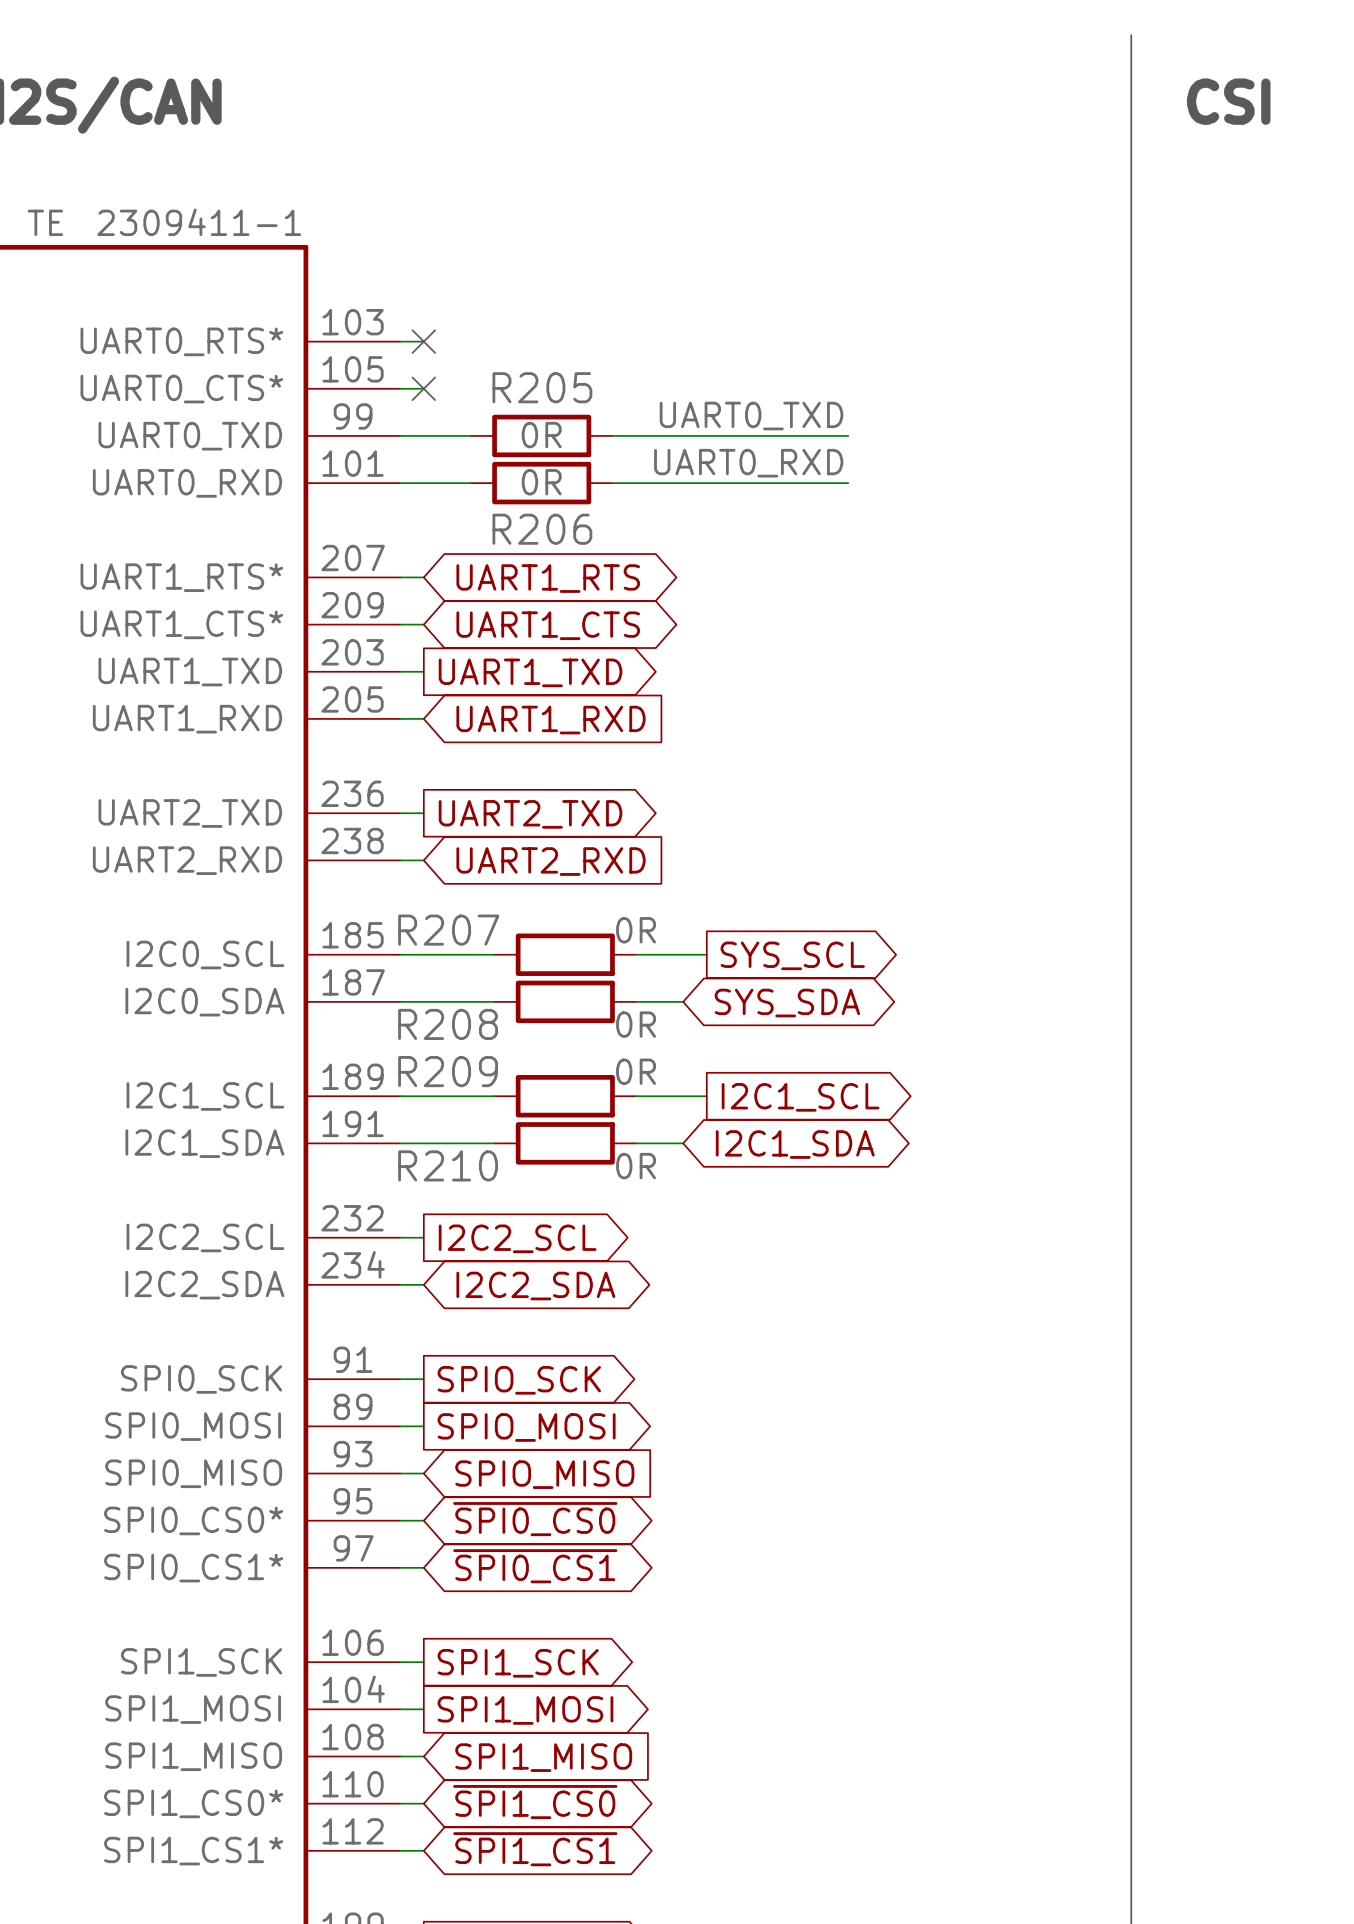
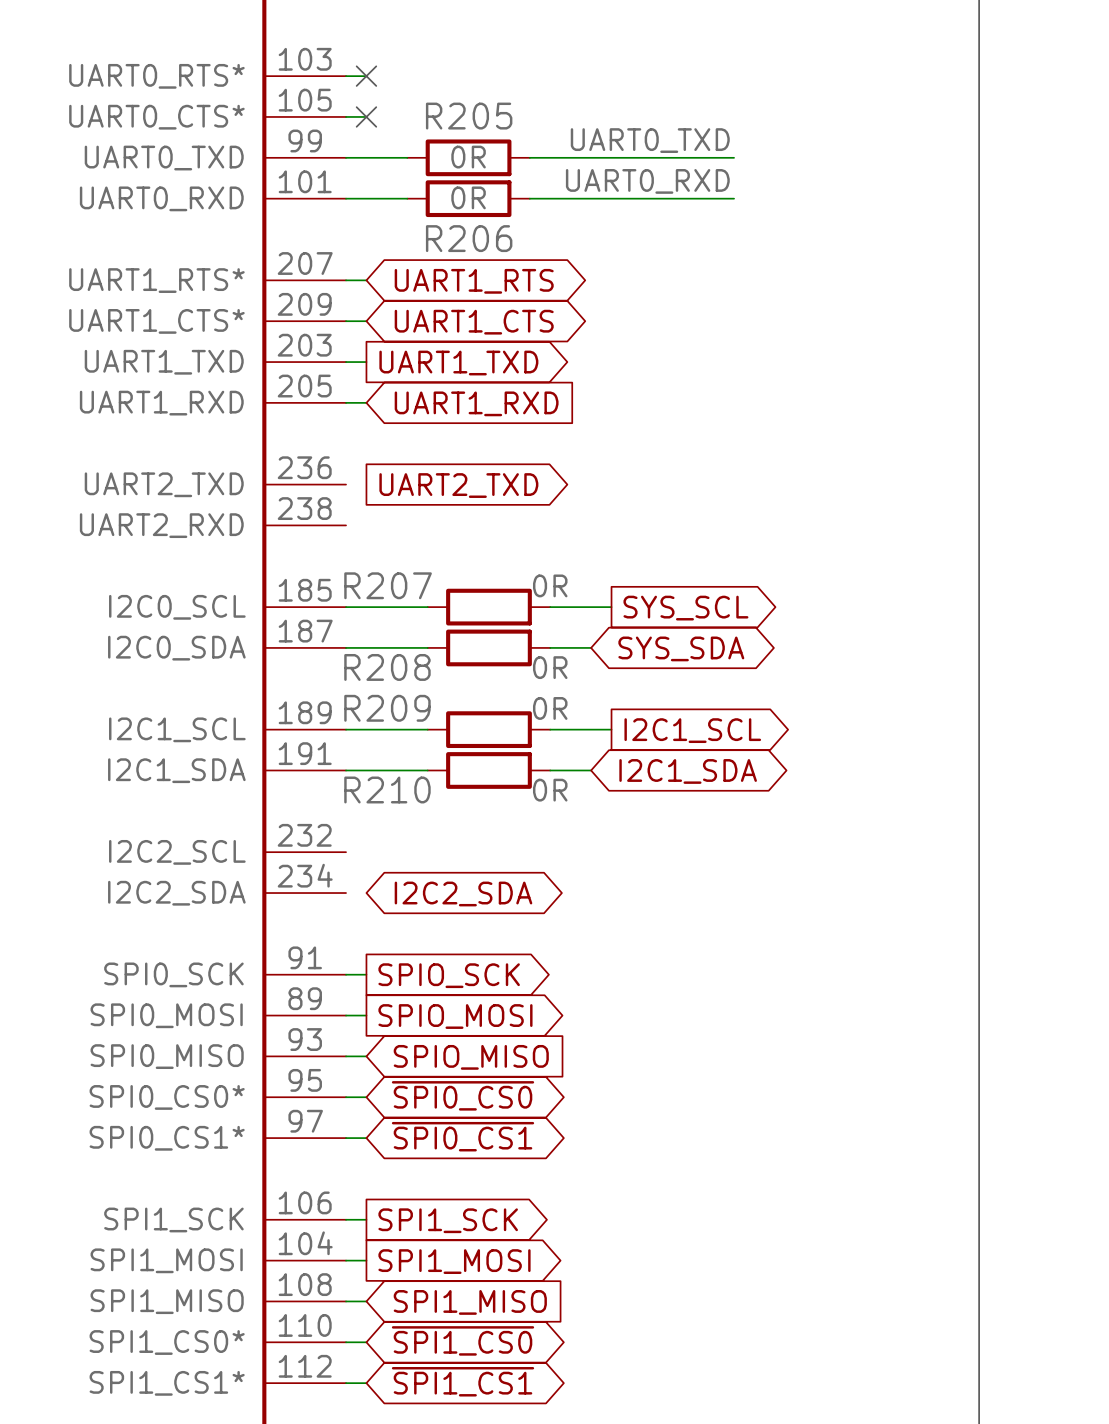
wire: (400, 813) (423, 813) -> none
wire: (400, 860) (423, 860) -> none
global label: UART2_RXD (551, 861) -> none
wire: (400, 1237) (423, 1237) -> none
global label: I2C2_SCL (517, 1238) -> none
wire: (400, 1284) (423, 1284) -> none

